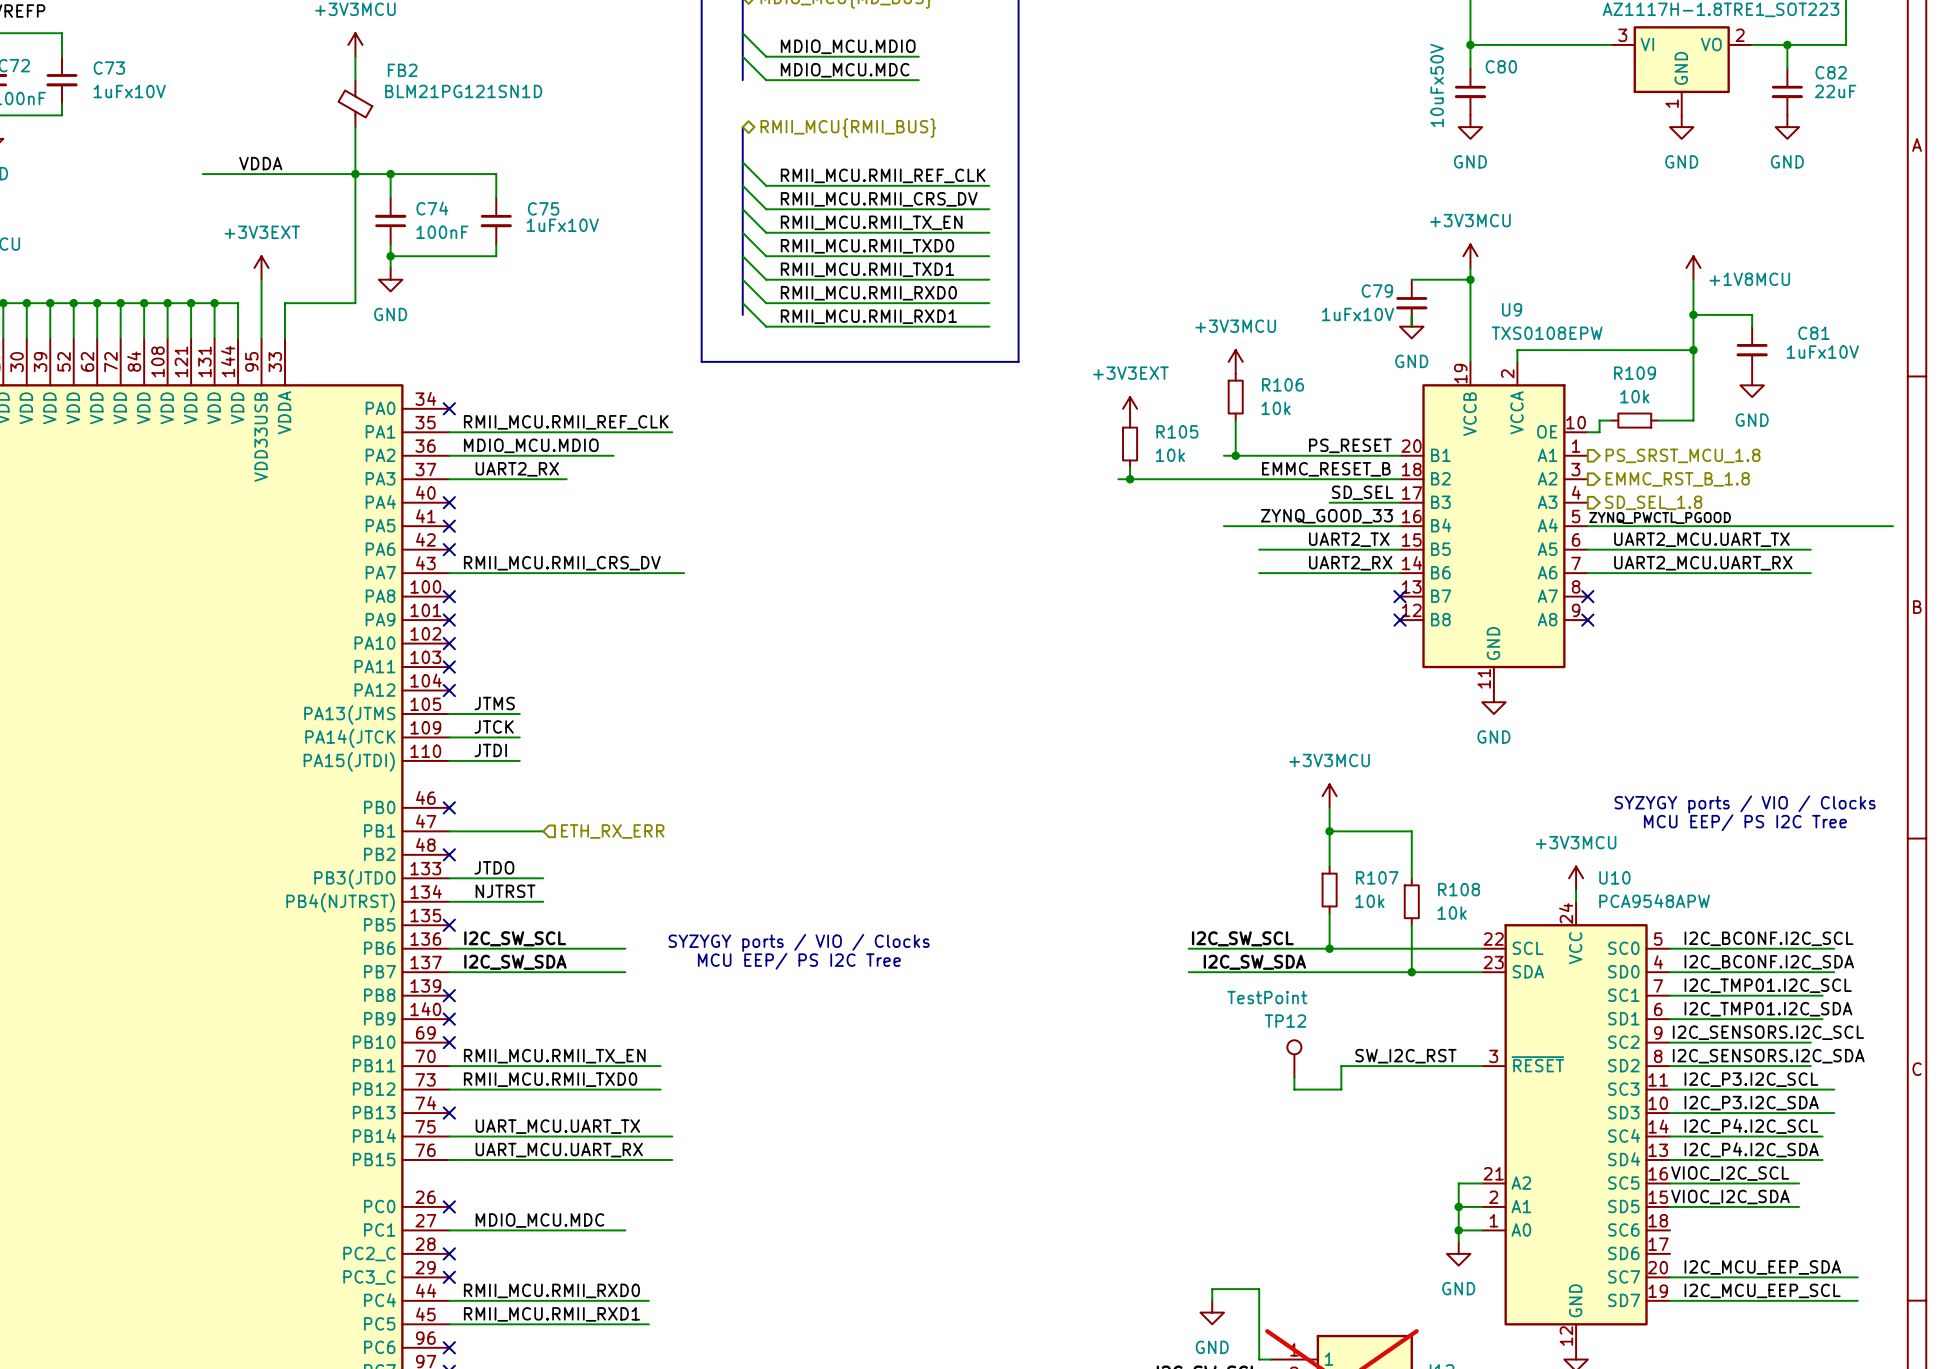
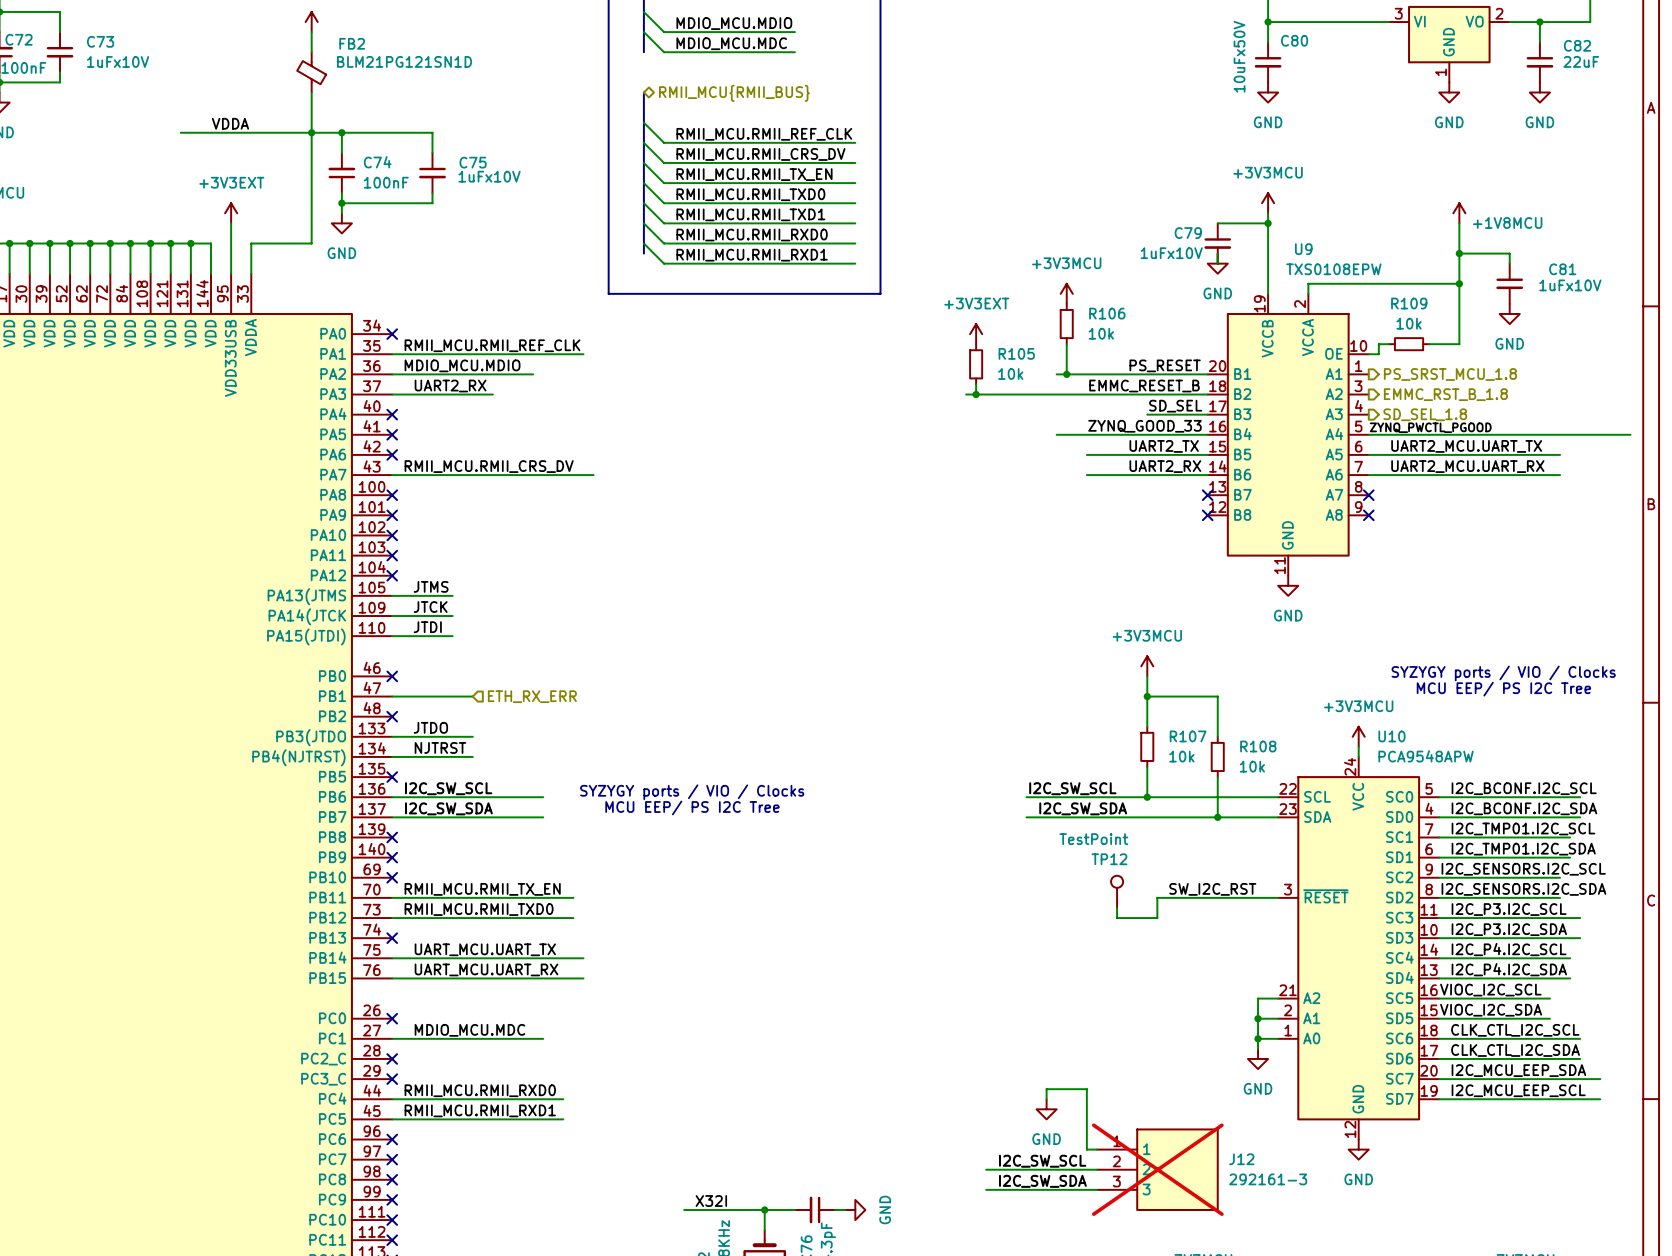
label: none -> CLK_CTL_I2C_SCL (1515, 1030)
wire: none -> (1439, 1038) (1580, 1038)
label: none -> CLK_CTL_I2C_SDA (1515, 1050)
wire: none -> (1439, 1058) (1580, 1058)

